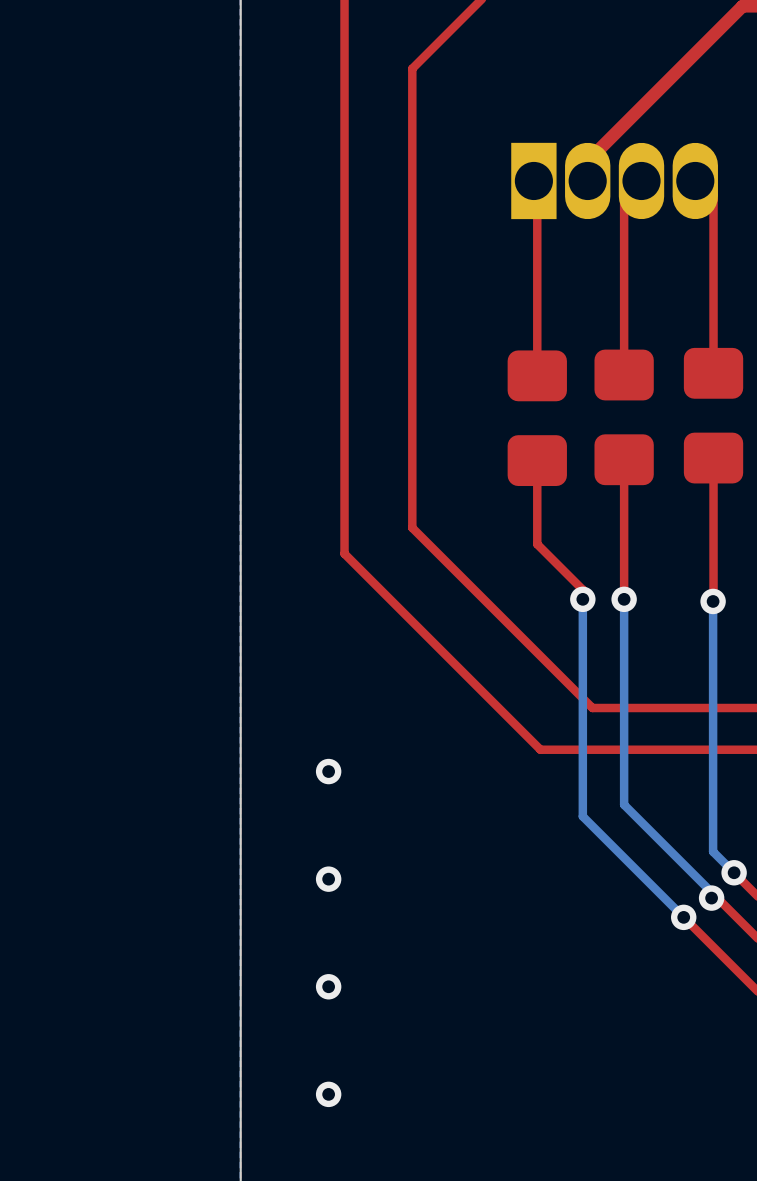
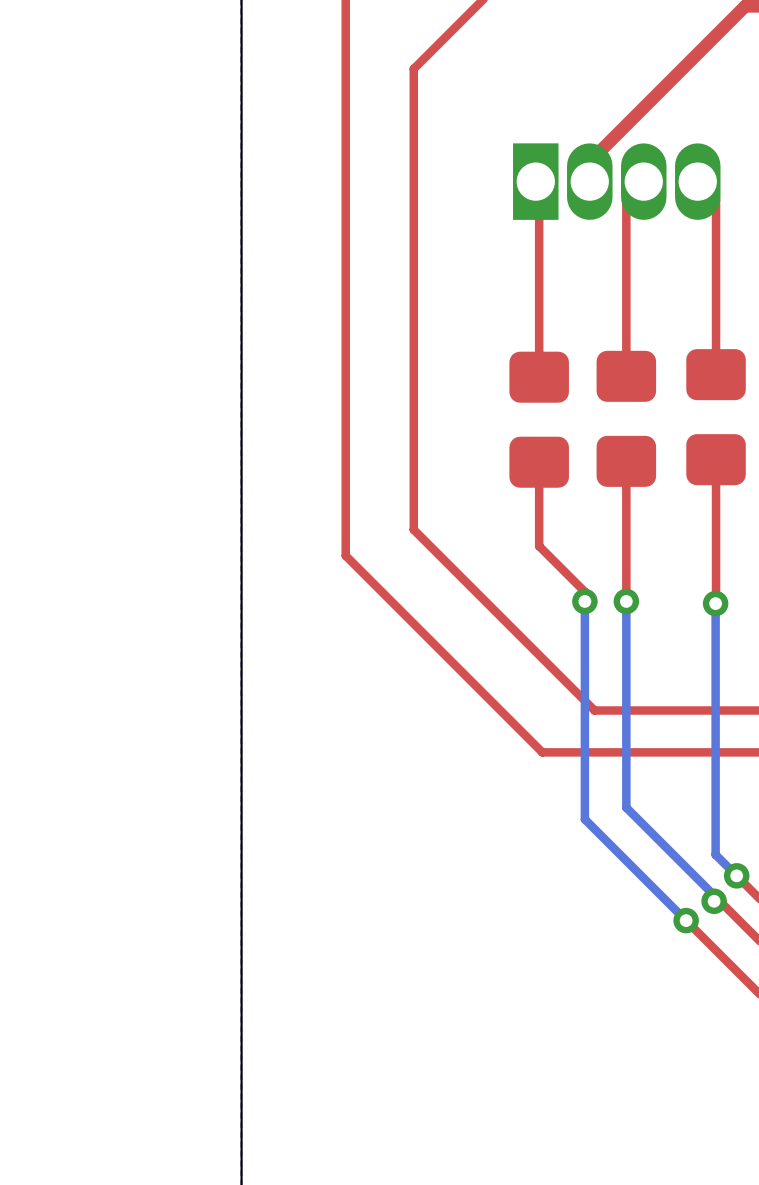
via: (328, 771) -> none
via: (328, 879) -> none
via: (328, 986) -> none
via: (328, 1094) -> none

